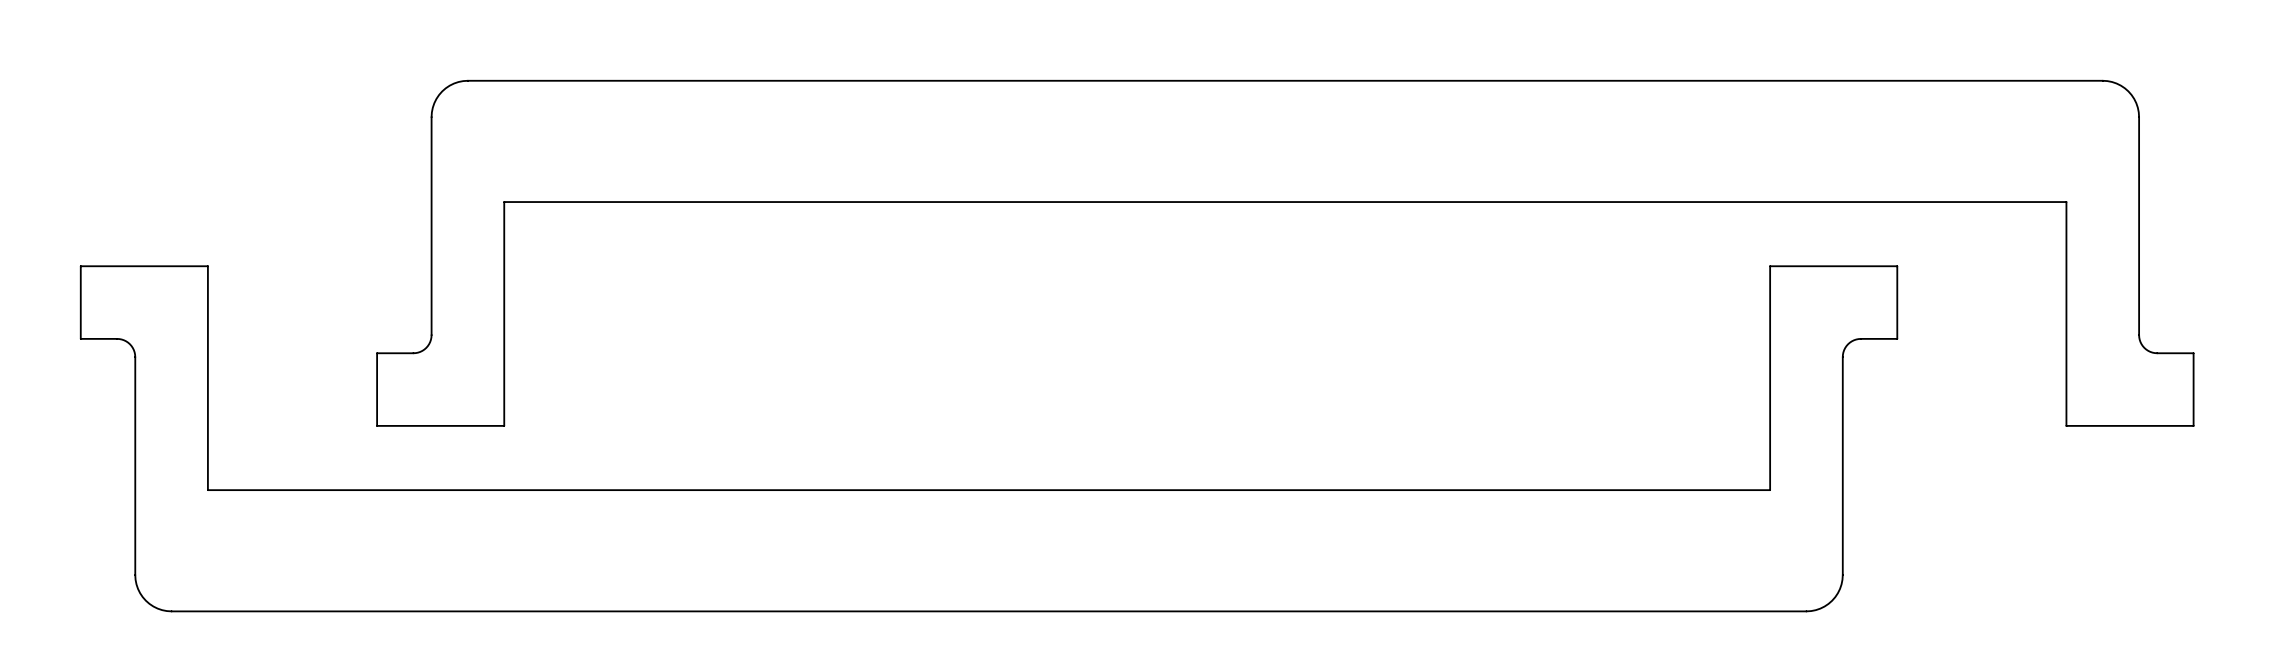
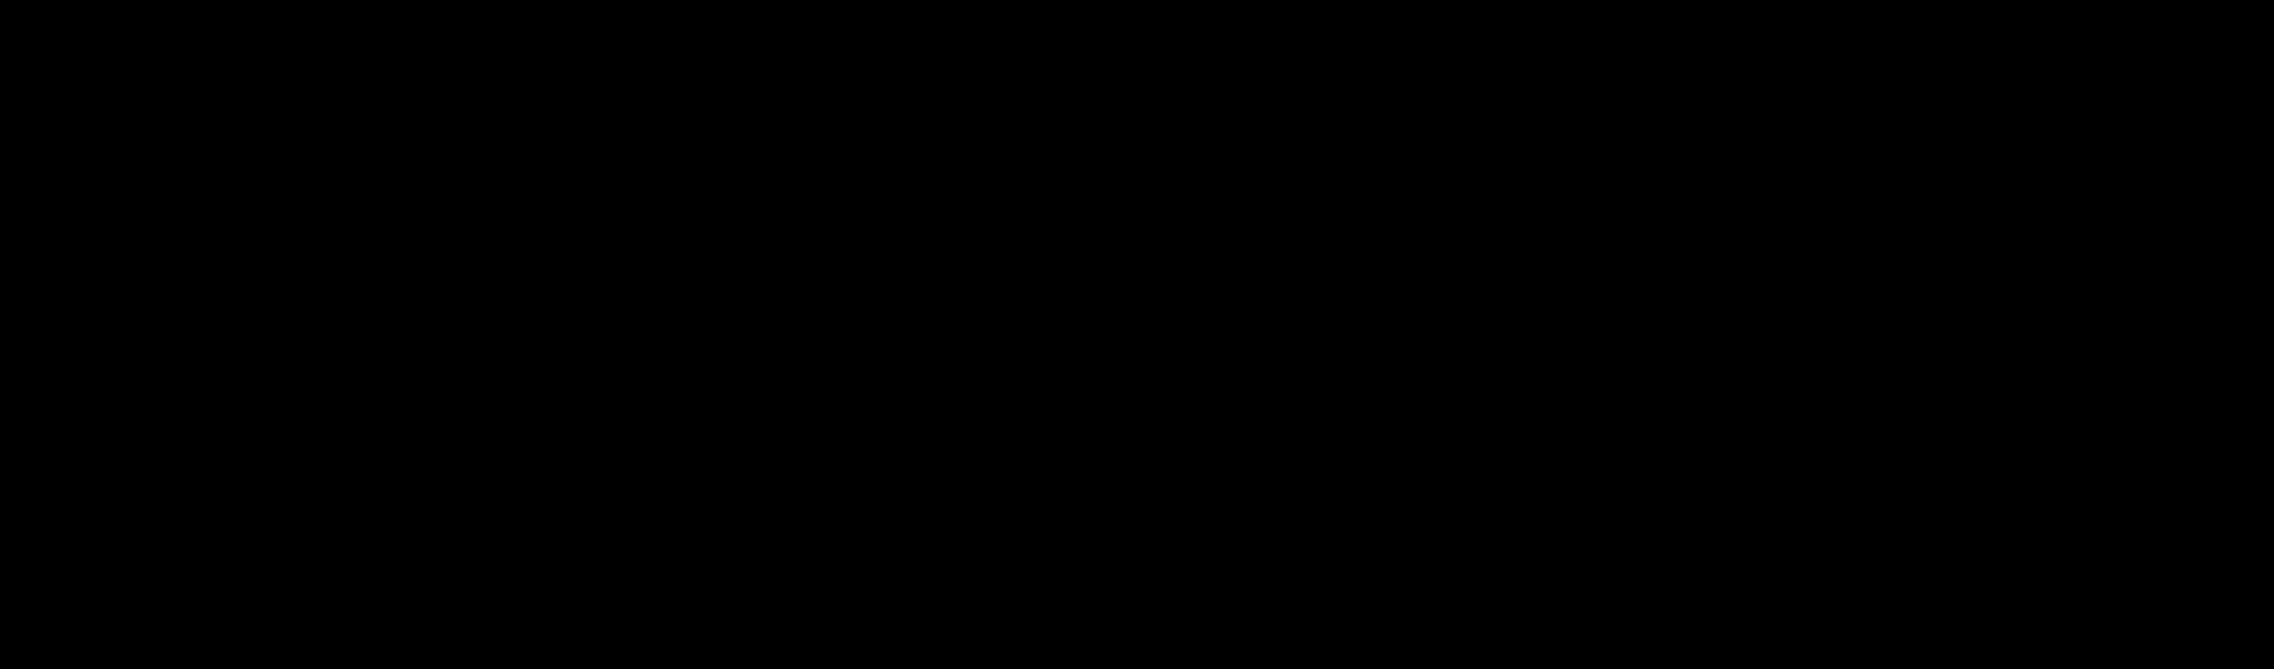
board edge: (467, 80) (2112, 82) (2124, 88) (2131, 94) (2138, 112) (2139, 339) (2144, 347) (2152, 352) (2193, 353) (2193, 425) (2066, 425) (2066, 202) (504, 202) (504, 425) (377, 425) (377, 353) (418, 352) (426, 347) (430, 339) (431, 112) (434, 103) (442, 91) (454, 83) (467, 80) -> none
board edge: (80, 266) (80, 338) (121, 339) (129, 344) (134, 352) (135, 579) (138, 588) (145, 600) (157, 608) (171, 611) (1811, 611) (1820, 608) (1832, 600) (1837, 593) (1842, 579) (1843, 352) (1848, 344) (1856, 339) (1897, 338) (1897, 266) (1770, 266) (1770, 490) (207, 490) (207, 266) (80, 266) -> none

